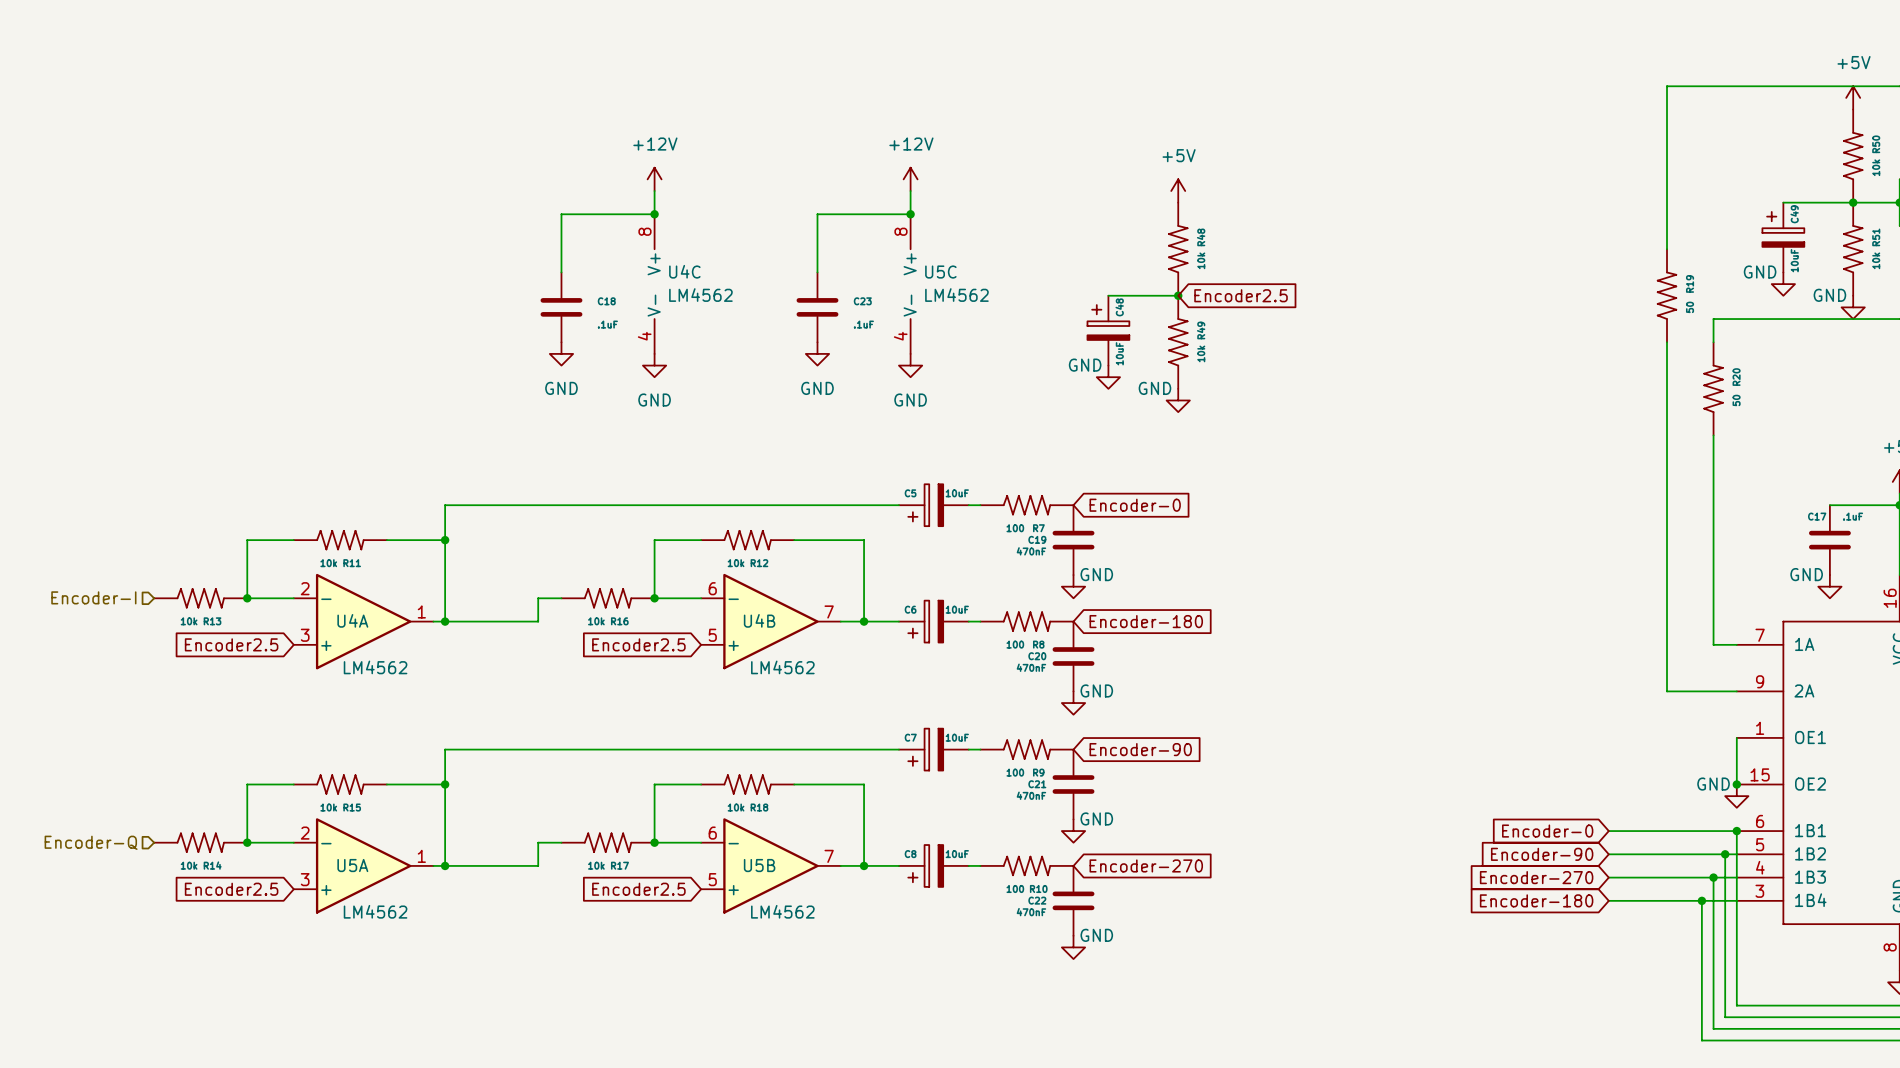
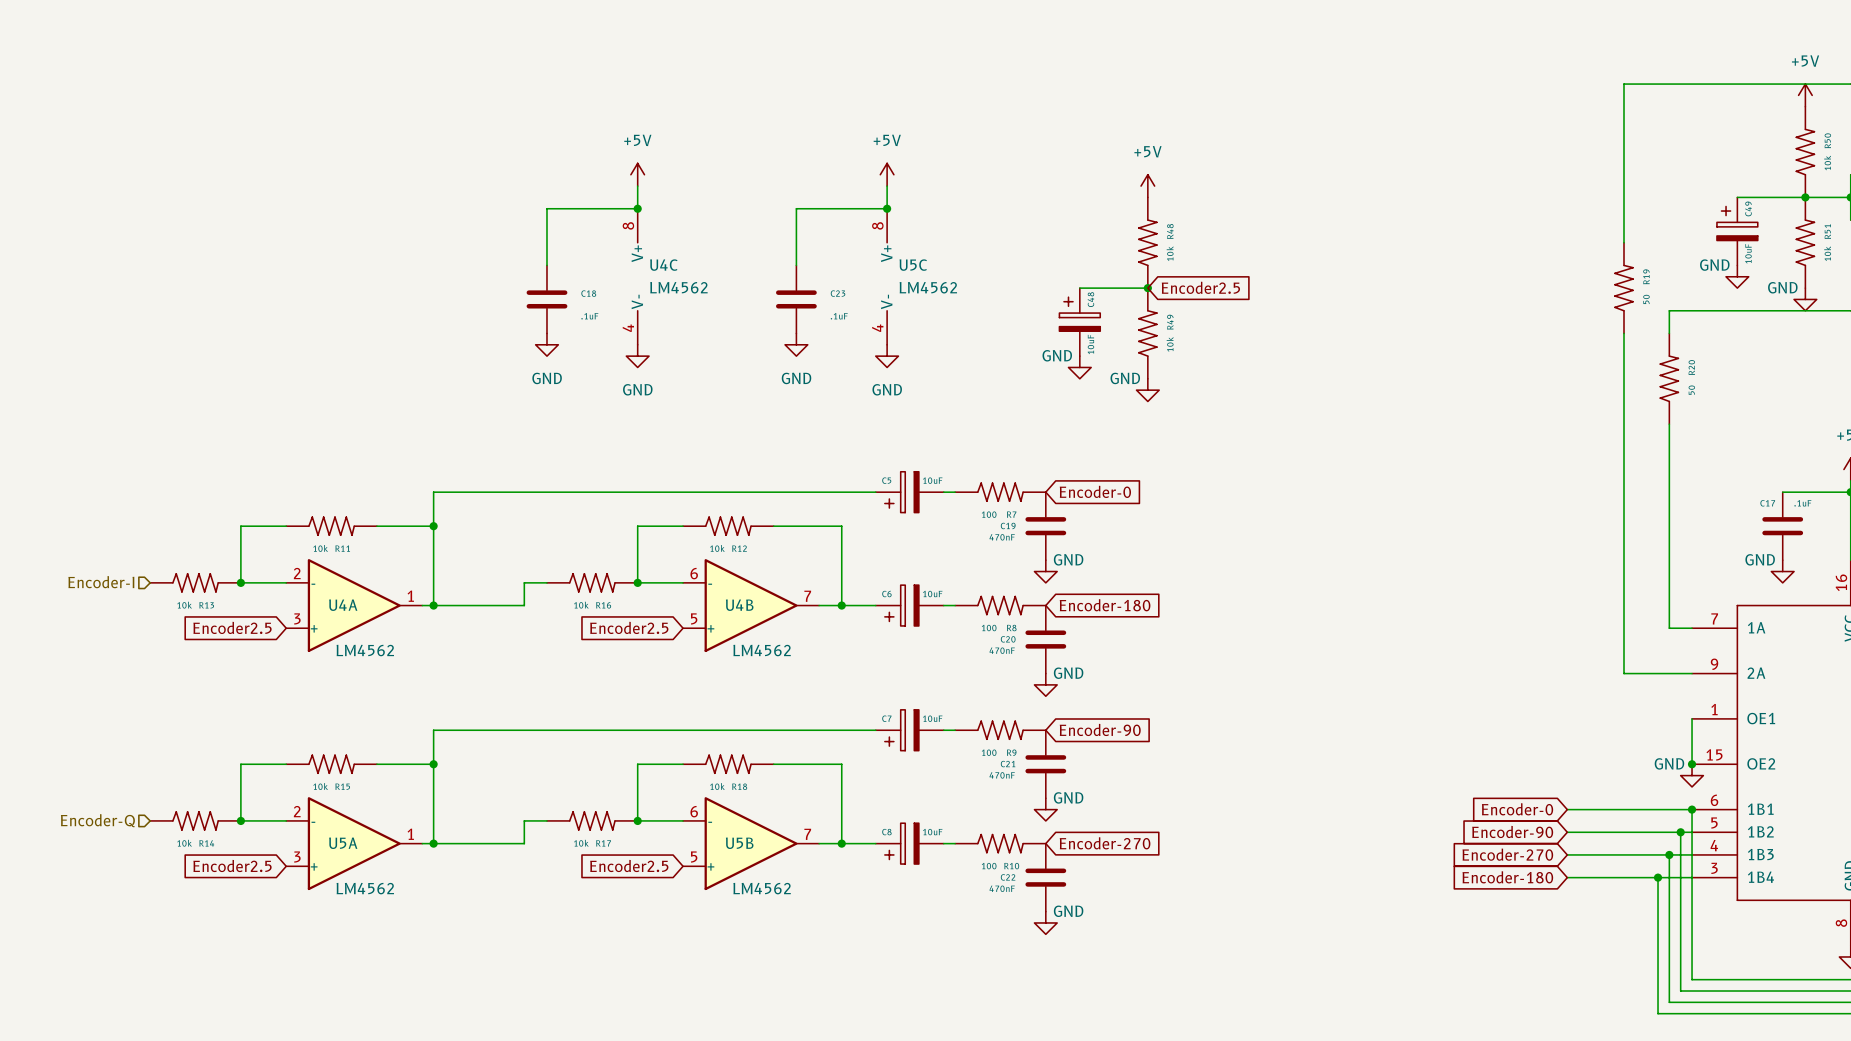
power symbol: +12V (654, 179) -> +5V (637, 174)
power symbol: +12V (910, 179) -> +5V (887, 174)

